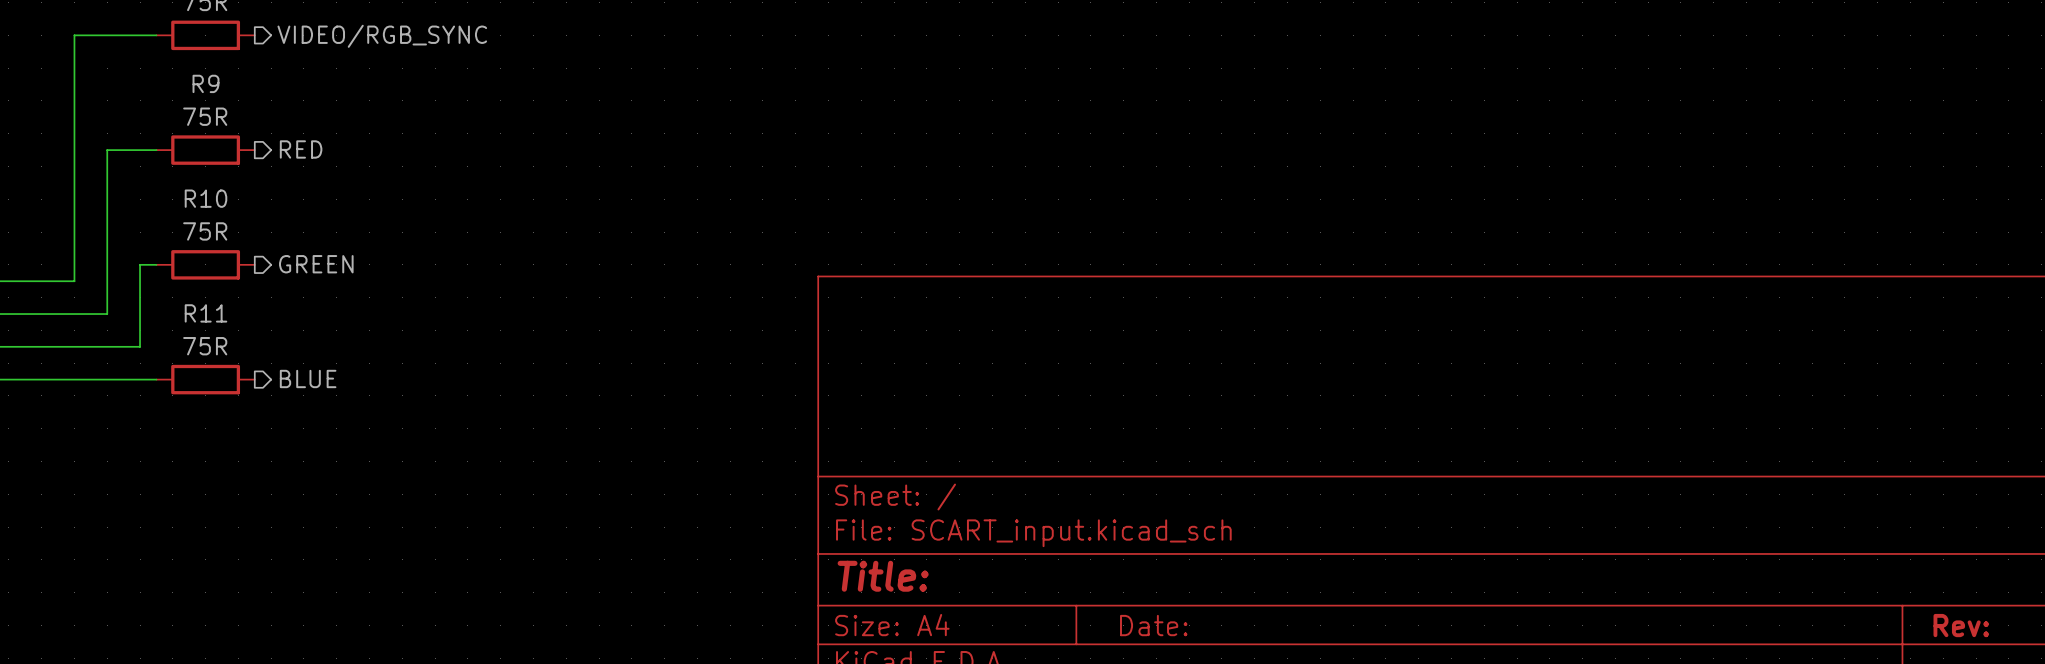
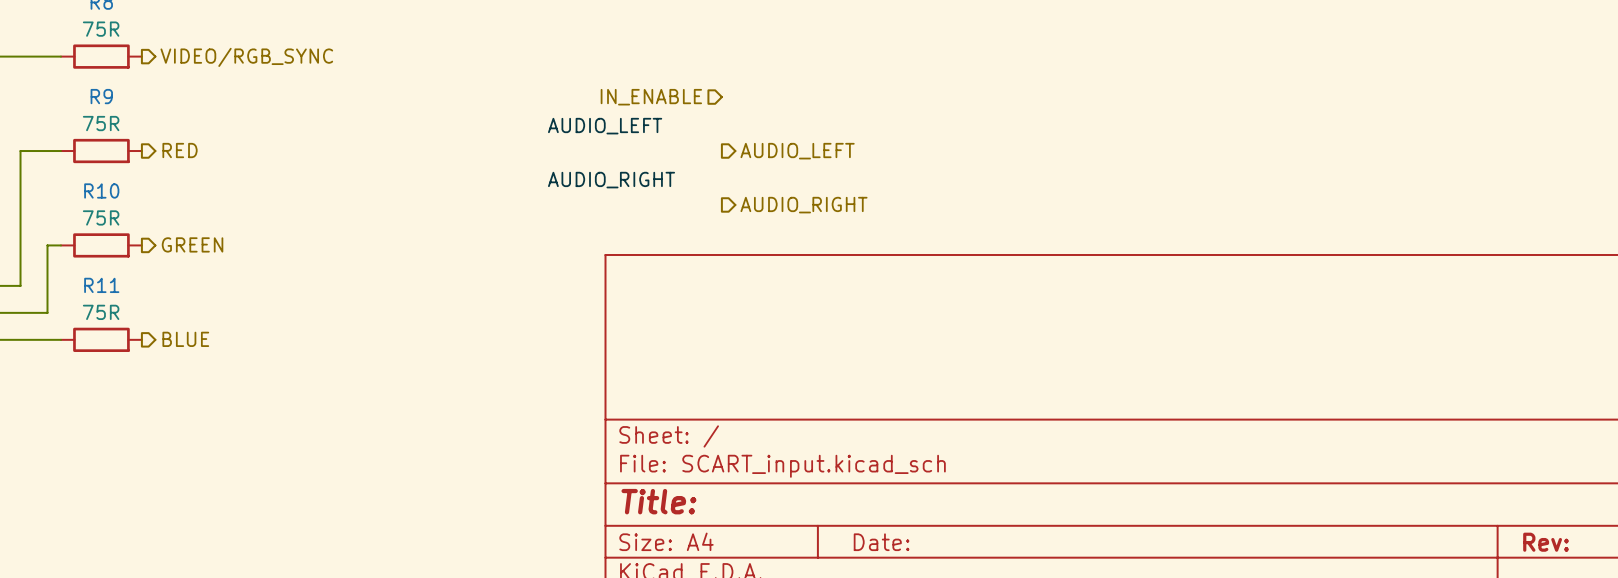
hierarchical label: none -> IN_ENABLE (651, 97)
label: none -> AUDIO_LEFT (605, 126)
hierarchical label: none -> AUDIO_LEFT (797, 151)
label: none -> AUDIO_RIGHT (611, 180)
hierarchical label: none -> AUDIO_RIGHT (804, 205)

